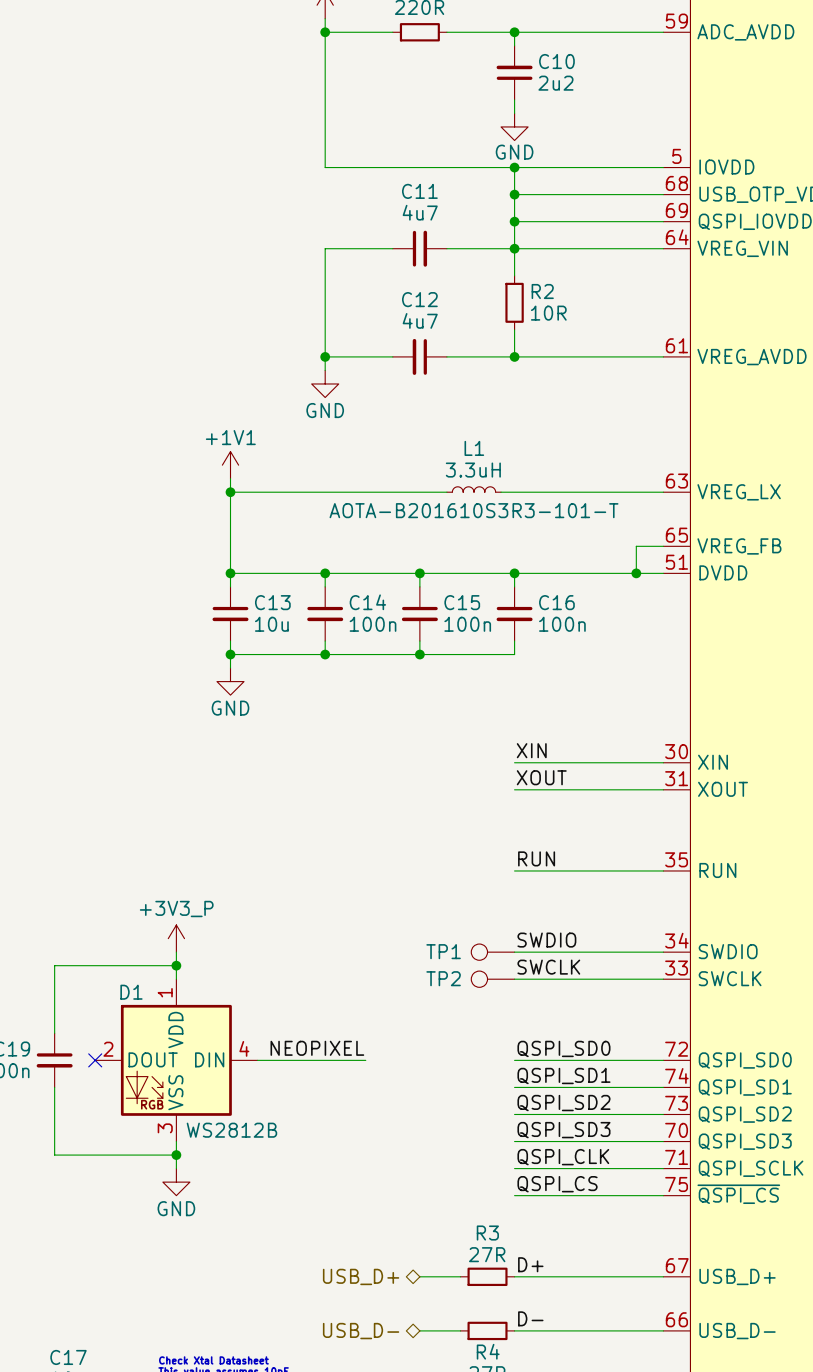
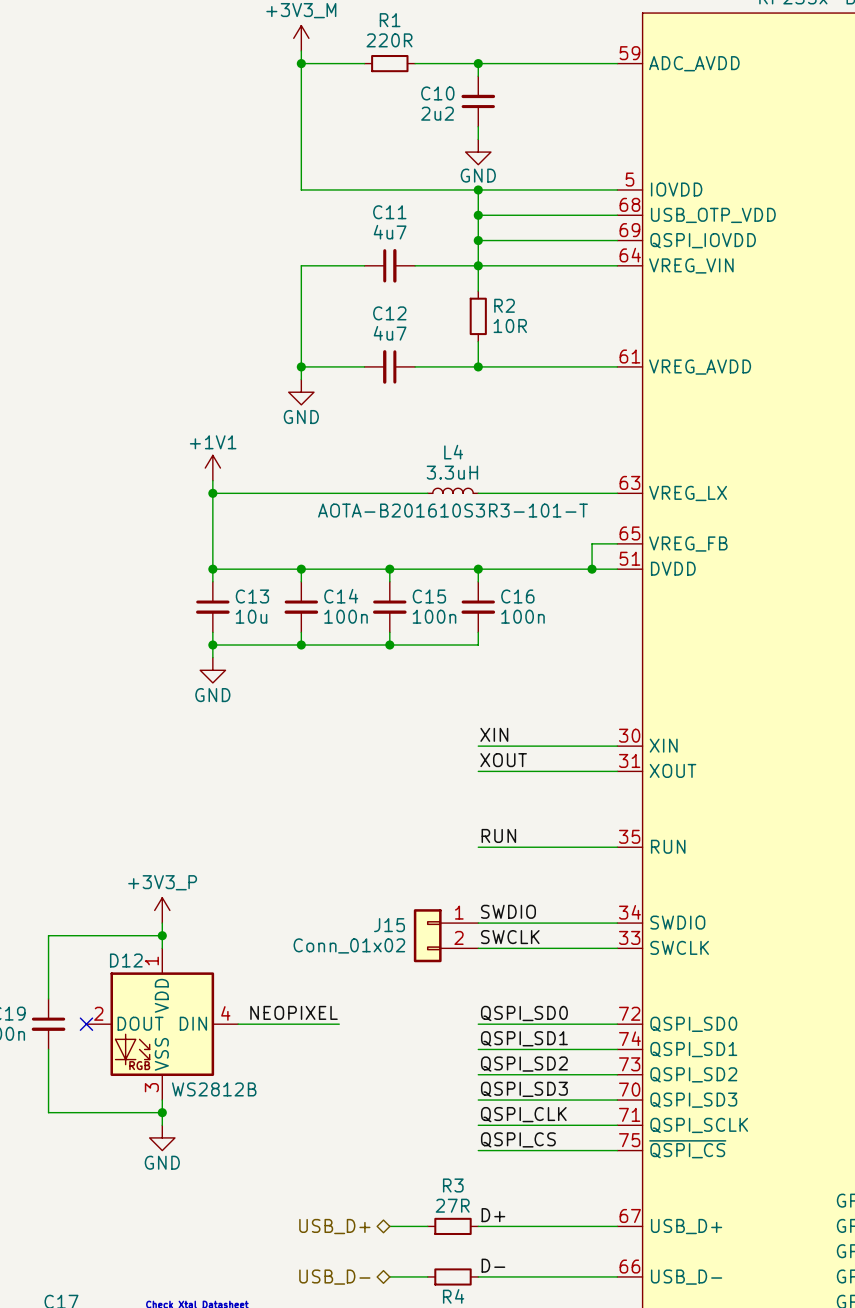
C10 name position: C10 (556, 61) -> C10 (437, 93)
C10 value position: 2u2 (555, 83) -> 2u2 (437, 113)
L1: 3.3uH (474, 489) -> none
L4: none -> 3.3uH (453, 490)
wire: (501, 492) (514, 492) -> (415, 493) (427, 493)
TP1: (492, 952) -> none
J15: none -> Conn_01x02 (446, 935)
TP2: (492, 979) -> none
D1 name: D1 (131, 992) -> D12 (126, 960)

